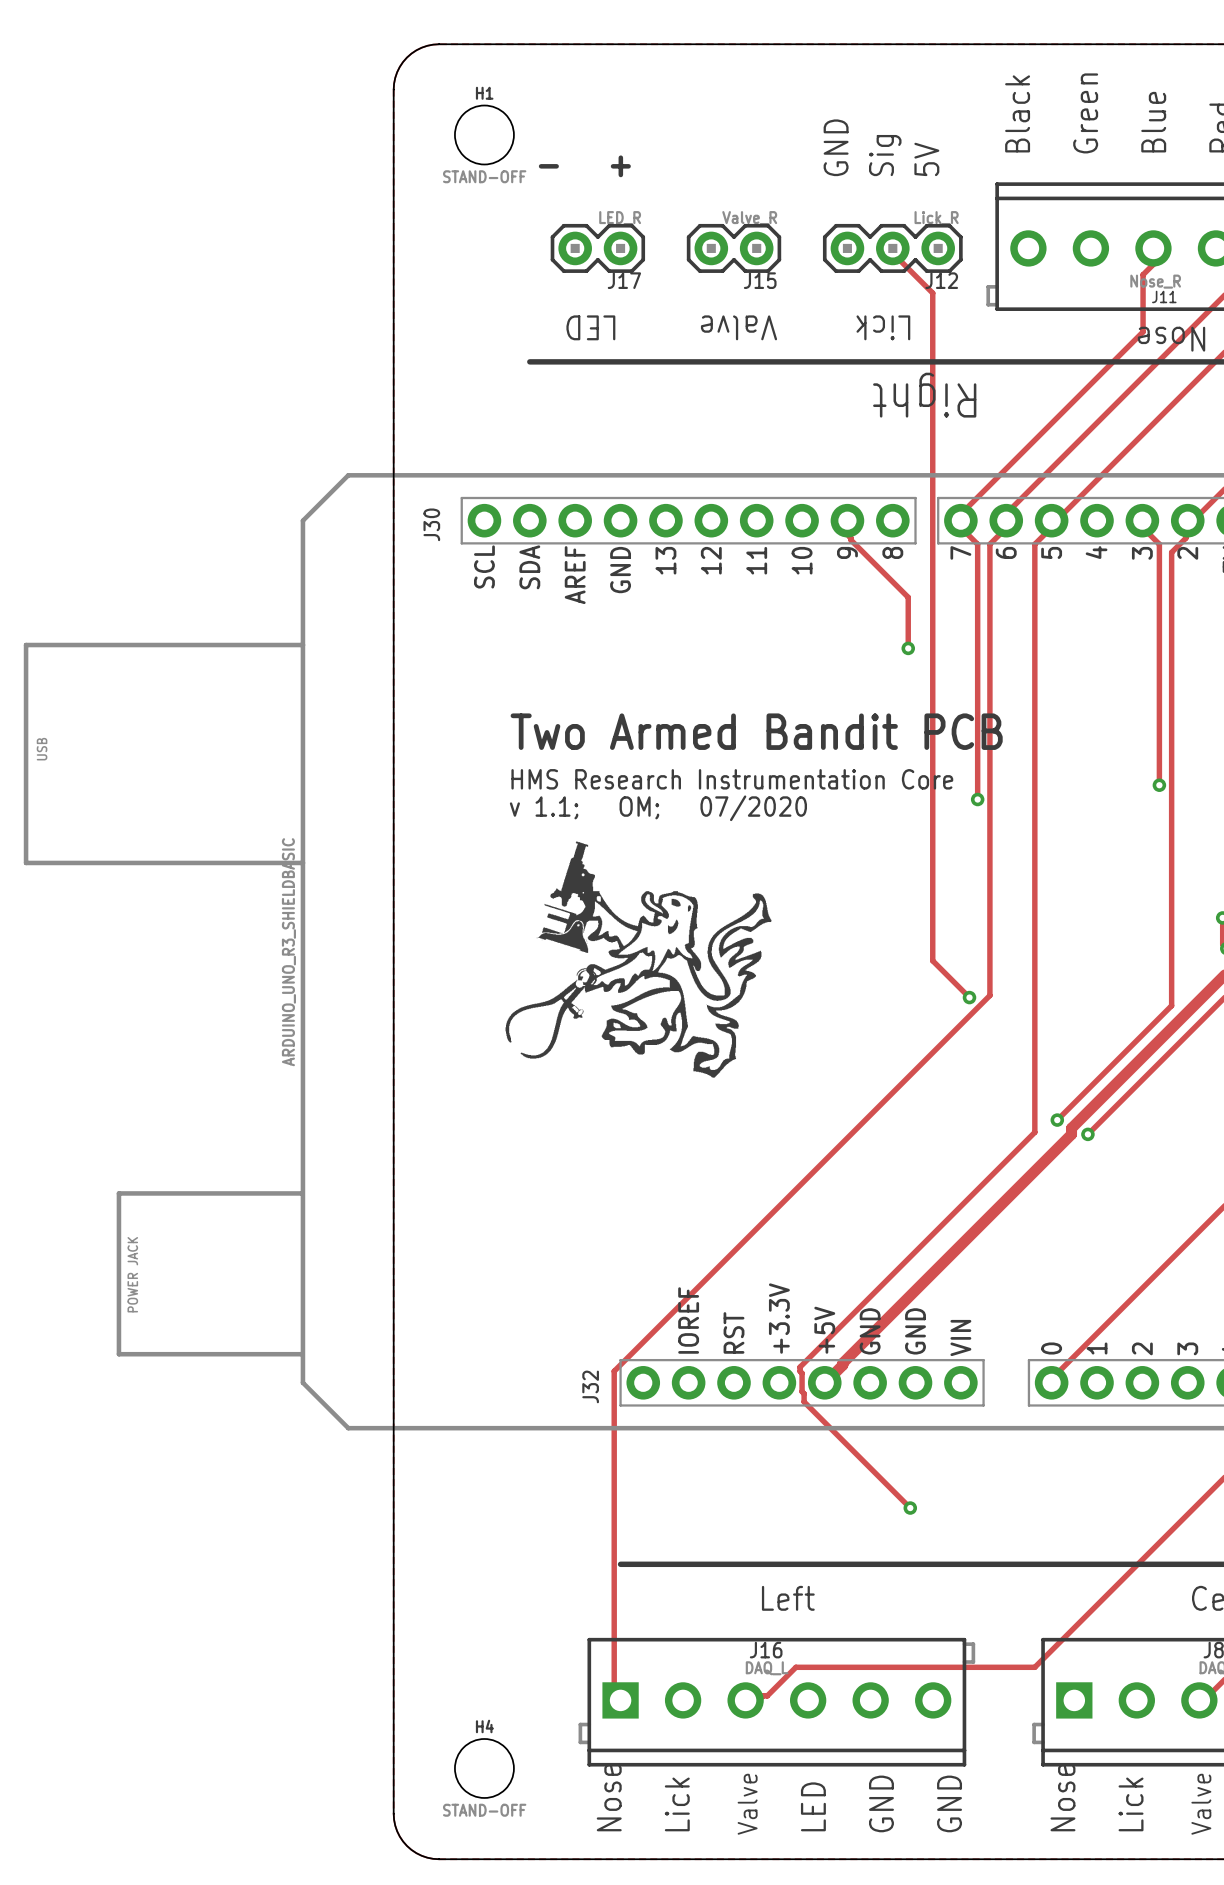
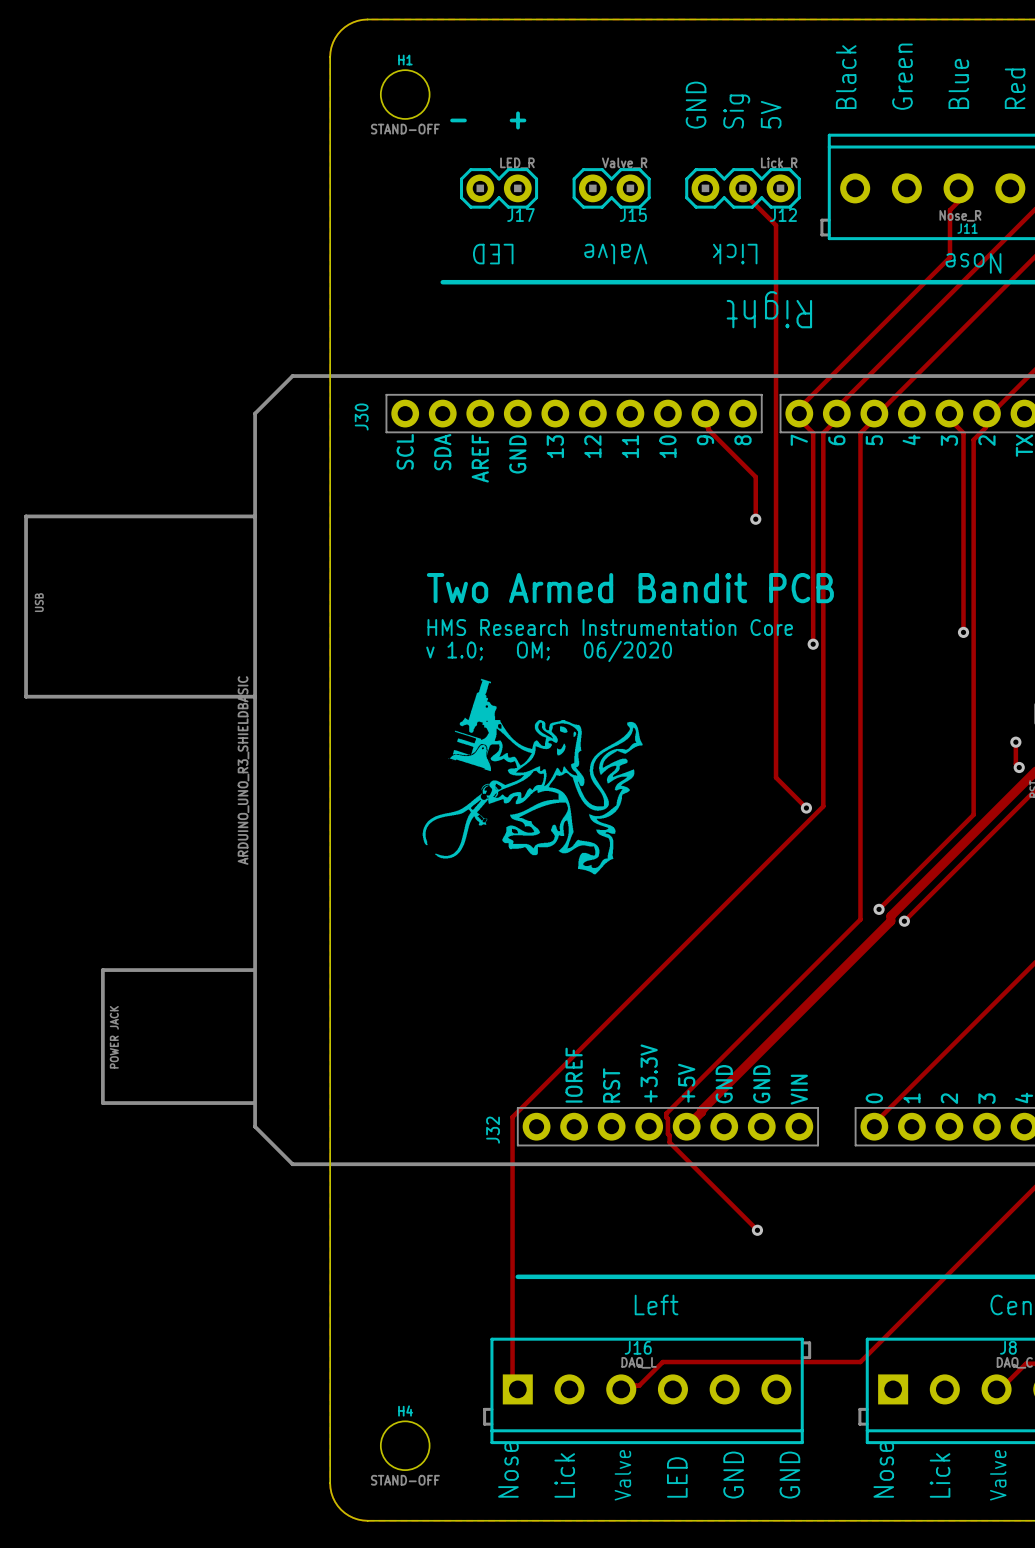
text: v 1.1; OM; 07/2020 (658, 808) -> v 1.0; OM; 06/2020 (549, 651)

